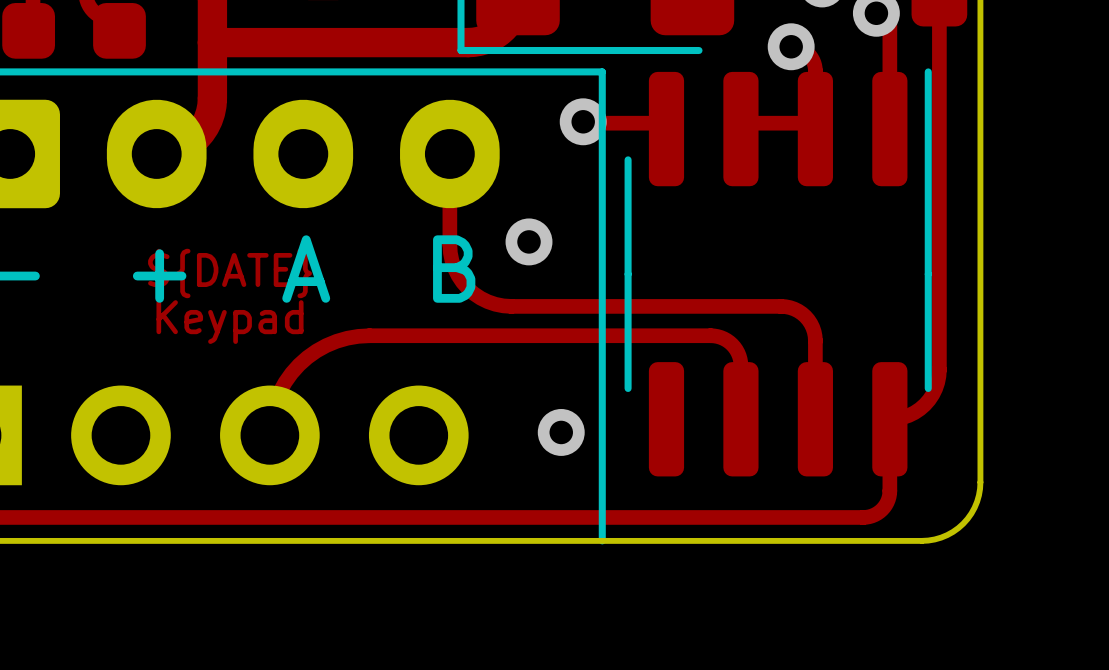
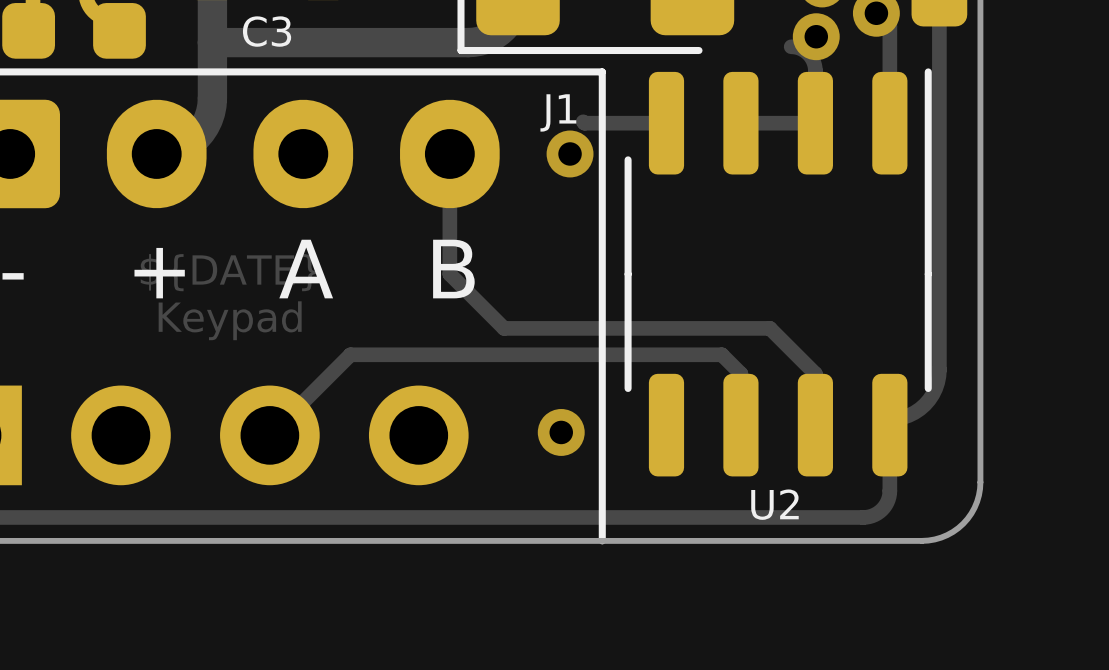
C3: none -> (267, 31)
via position: (791, 46) -> (816, 36)
J1 name: none -> J1 (558, 112)
via position: (583, 121) -> (570, 153)
via: (529, 241) -> none
track: (449, 244) (451, 260) (462, 282) (480, 298) (503, 305) (781, 306) (794, 309) (808, 319) (814, 331) (815, 373) -> (449, 244) (449, 274) (504, 328) (769, 328) (815, 373)
part: (778, 272) -> none
U2: none -> (778, 272)
track: (740, 373) (740, 359) (736, 349) (726, 340) (714, 335) (358, 336) (326, 345) (299, 364) (279, 392) (272, 413) (269, 435) -> (740, 373) (721, 354) (350, 354) (269, 435)

